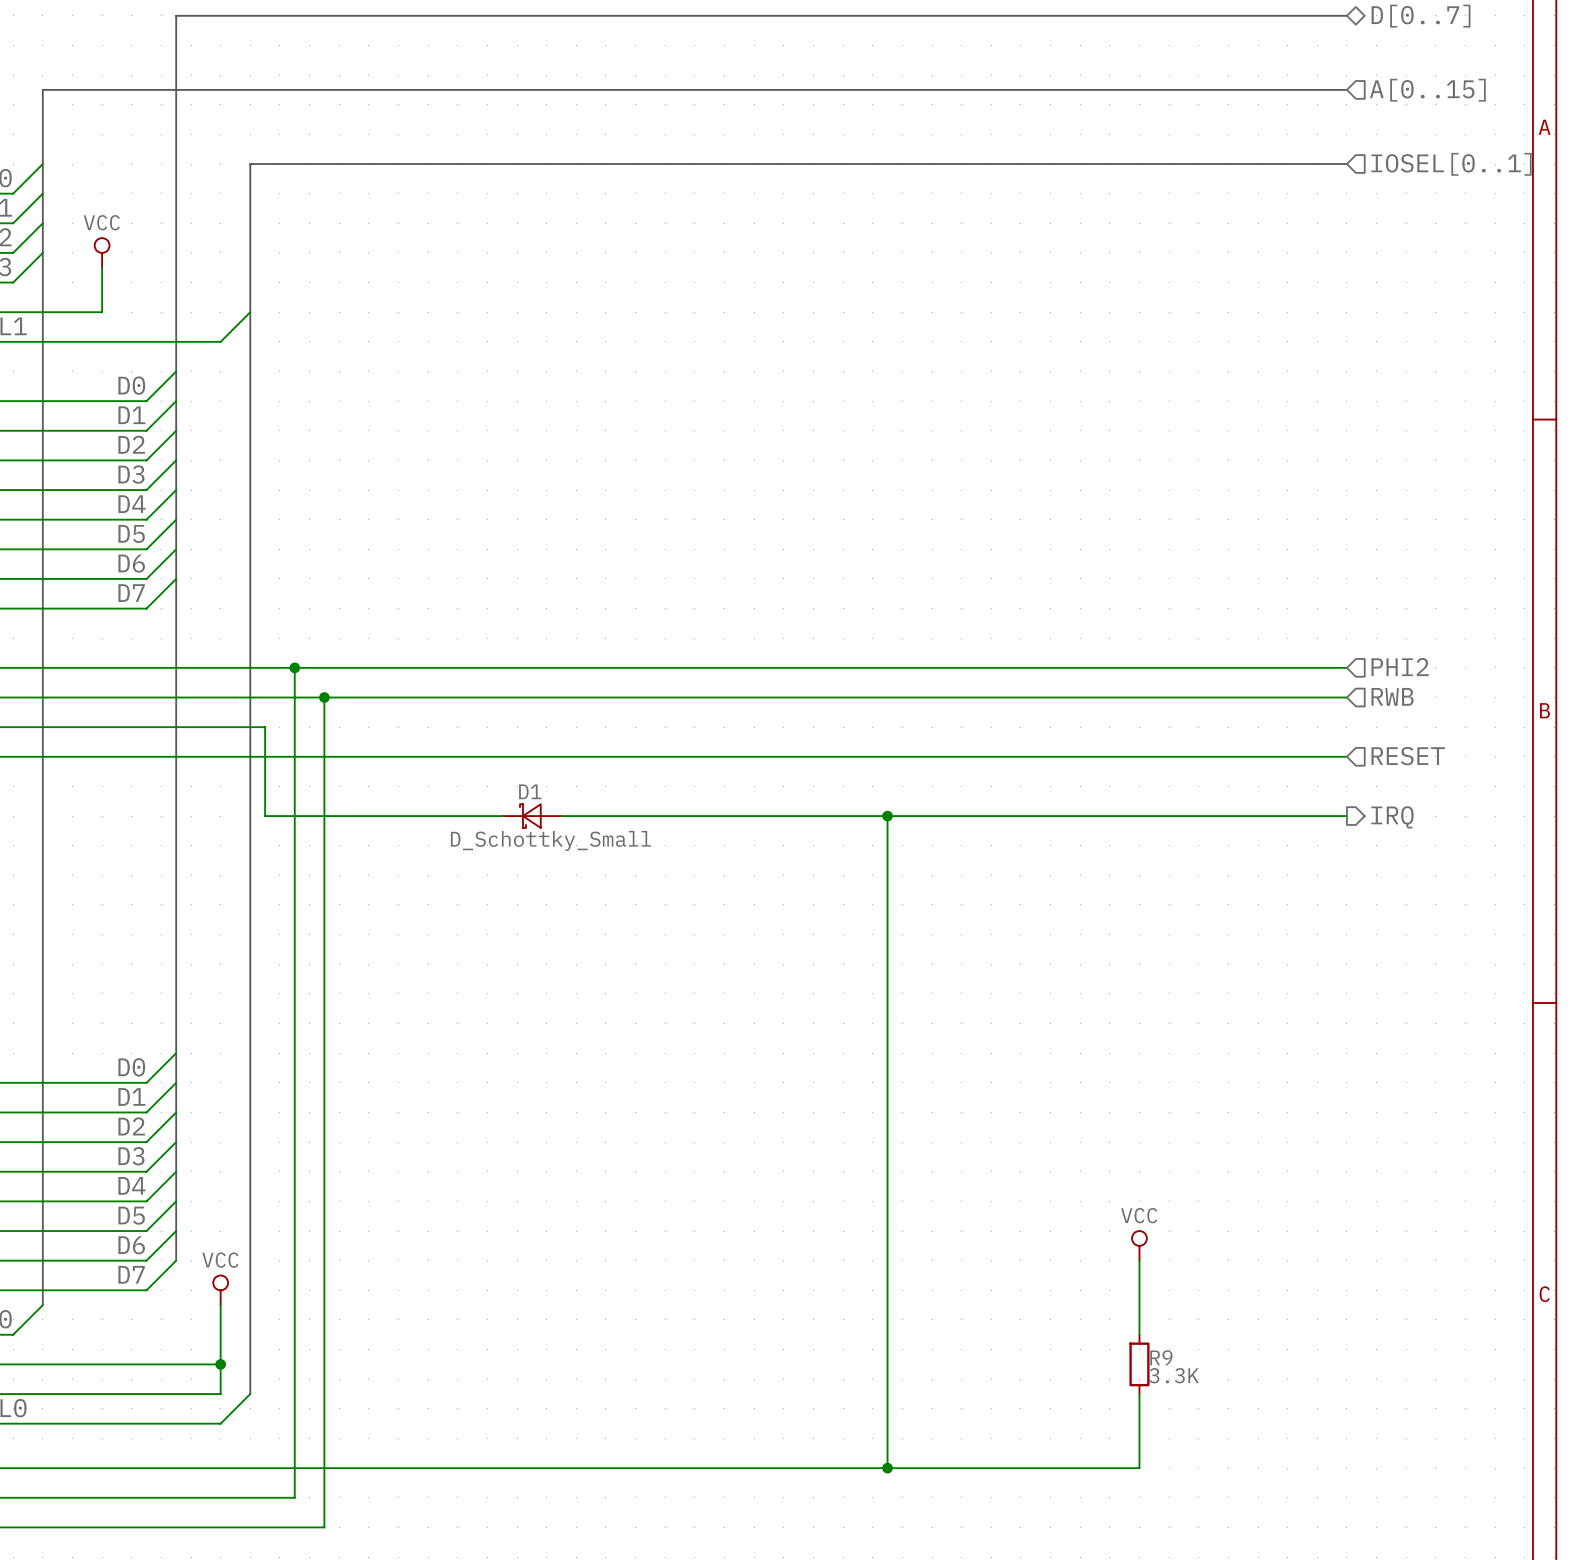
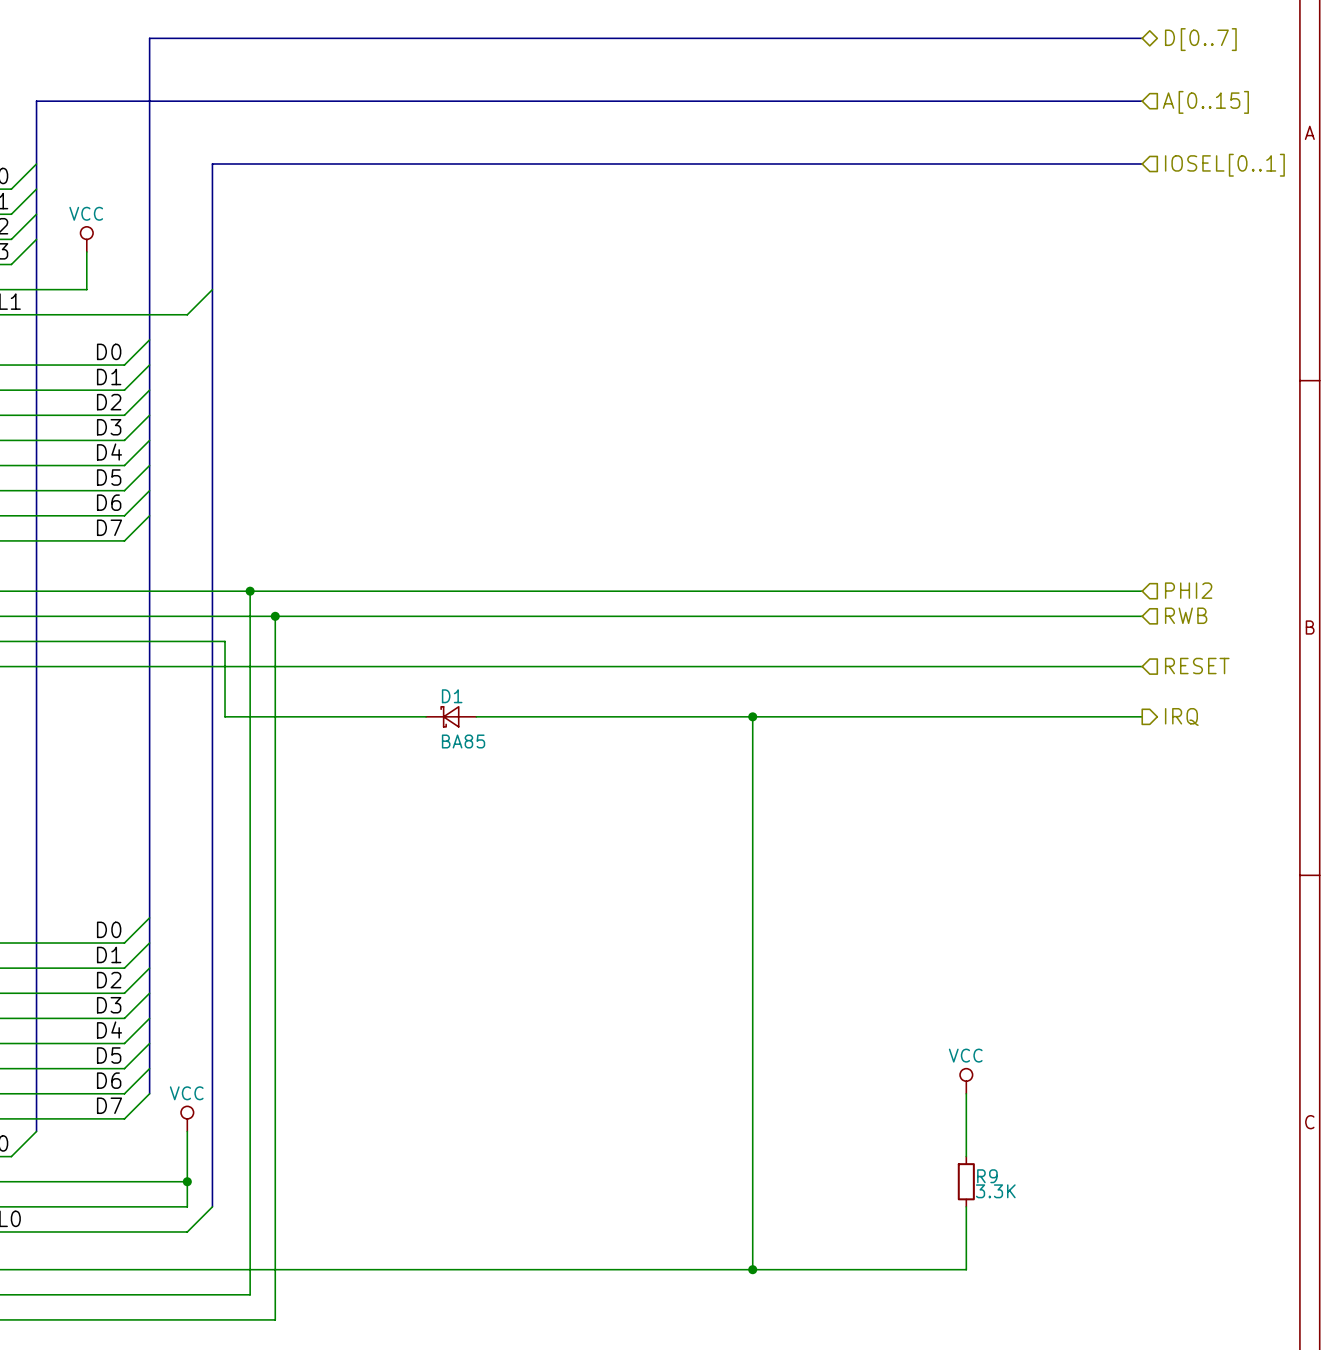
D1 value: D_Schottky_Small (550, 840) -> BA85 (463, 741)

